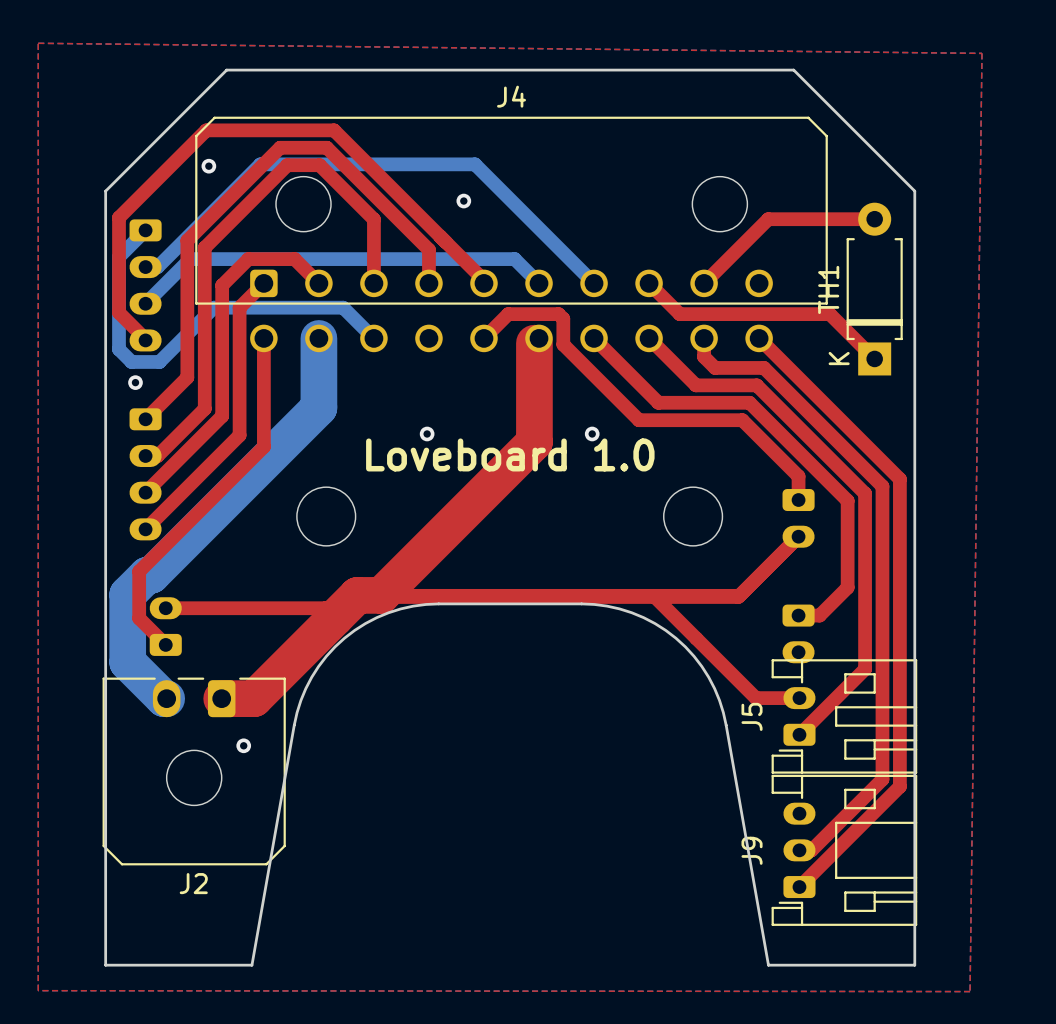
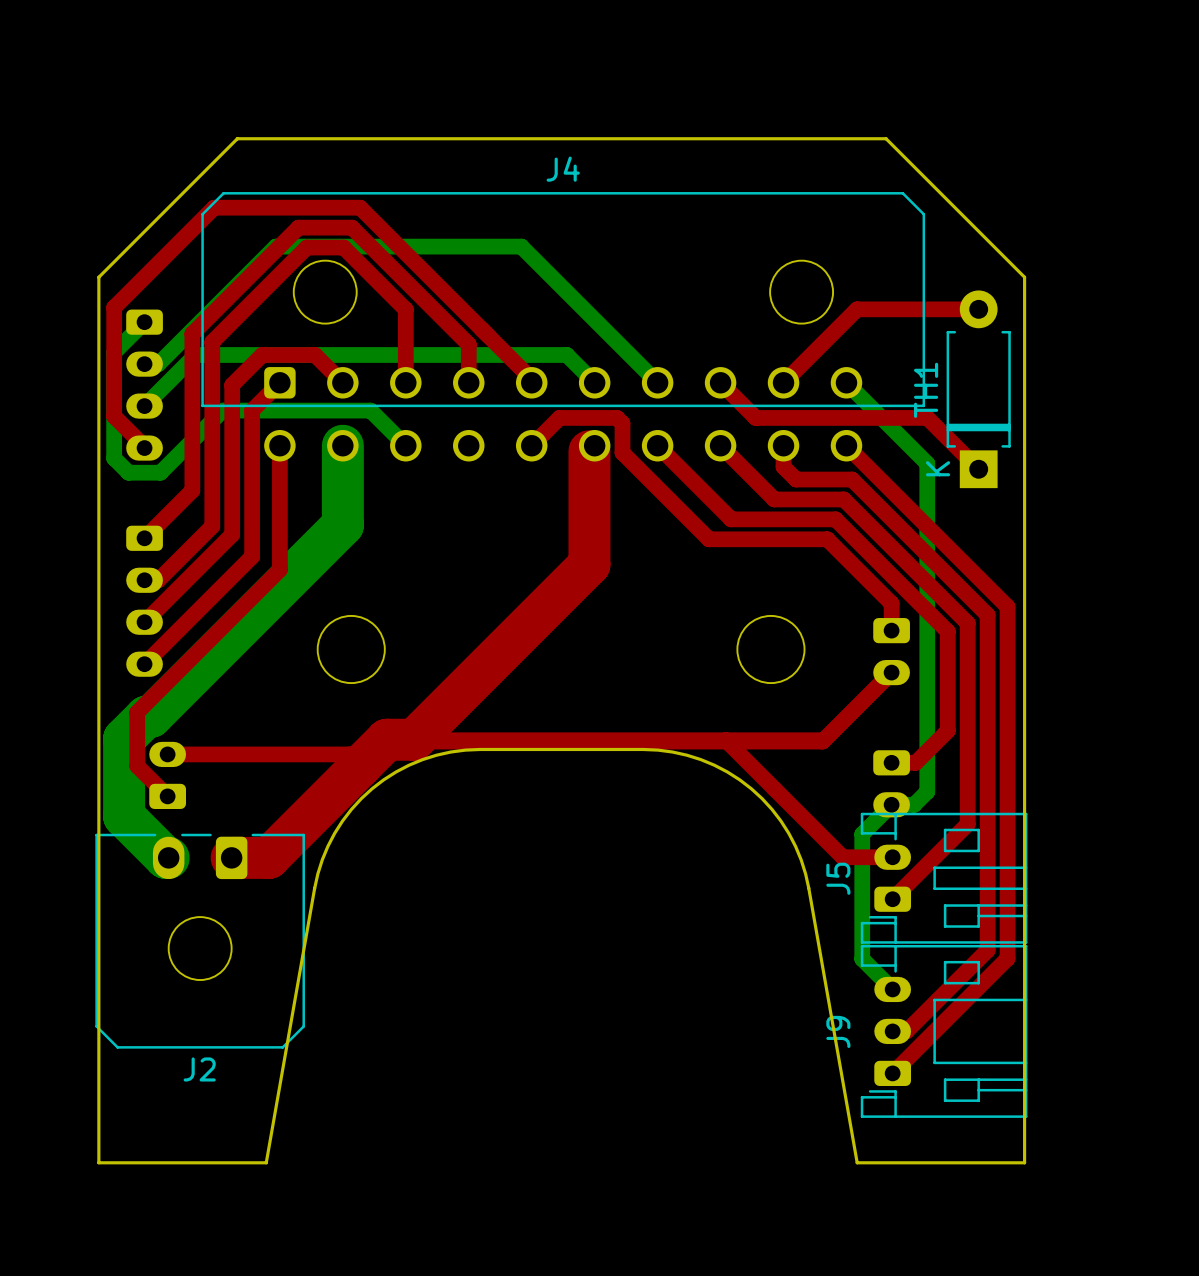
top zone outline: (38, 43) (38, 990) (970, 991) (981, 53) (38, 43) -> none
via: (208, 166) -> none
via: (463, 201) -> none
bottom track: none -> (846, 382) (927, 463) (927, 791) (914, 804) (891, 804) (862, 834) (862, 959) (892, 989)
via: (135, 382) -> none
via: (427, 433) -> none
via: (592, 433) -> none
text: Loveboard 1.0 (510, 454) -> none
via: (243, 745) -> none

